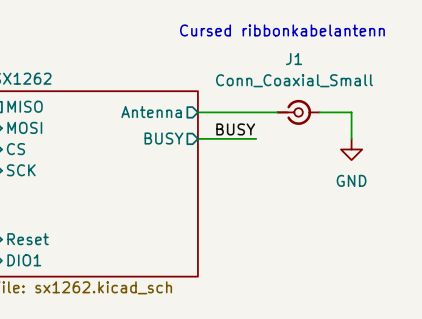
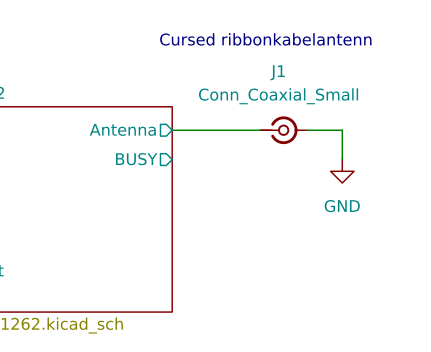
label: BUSY (235, 129) -> none
wire: (197, 138) (256, 138) -> none

